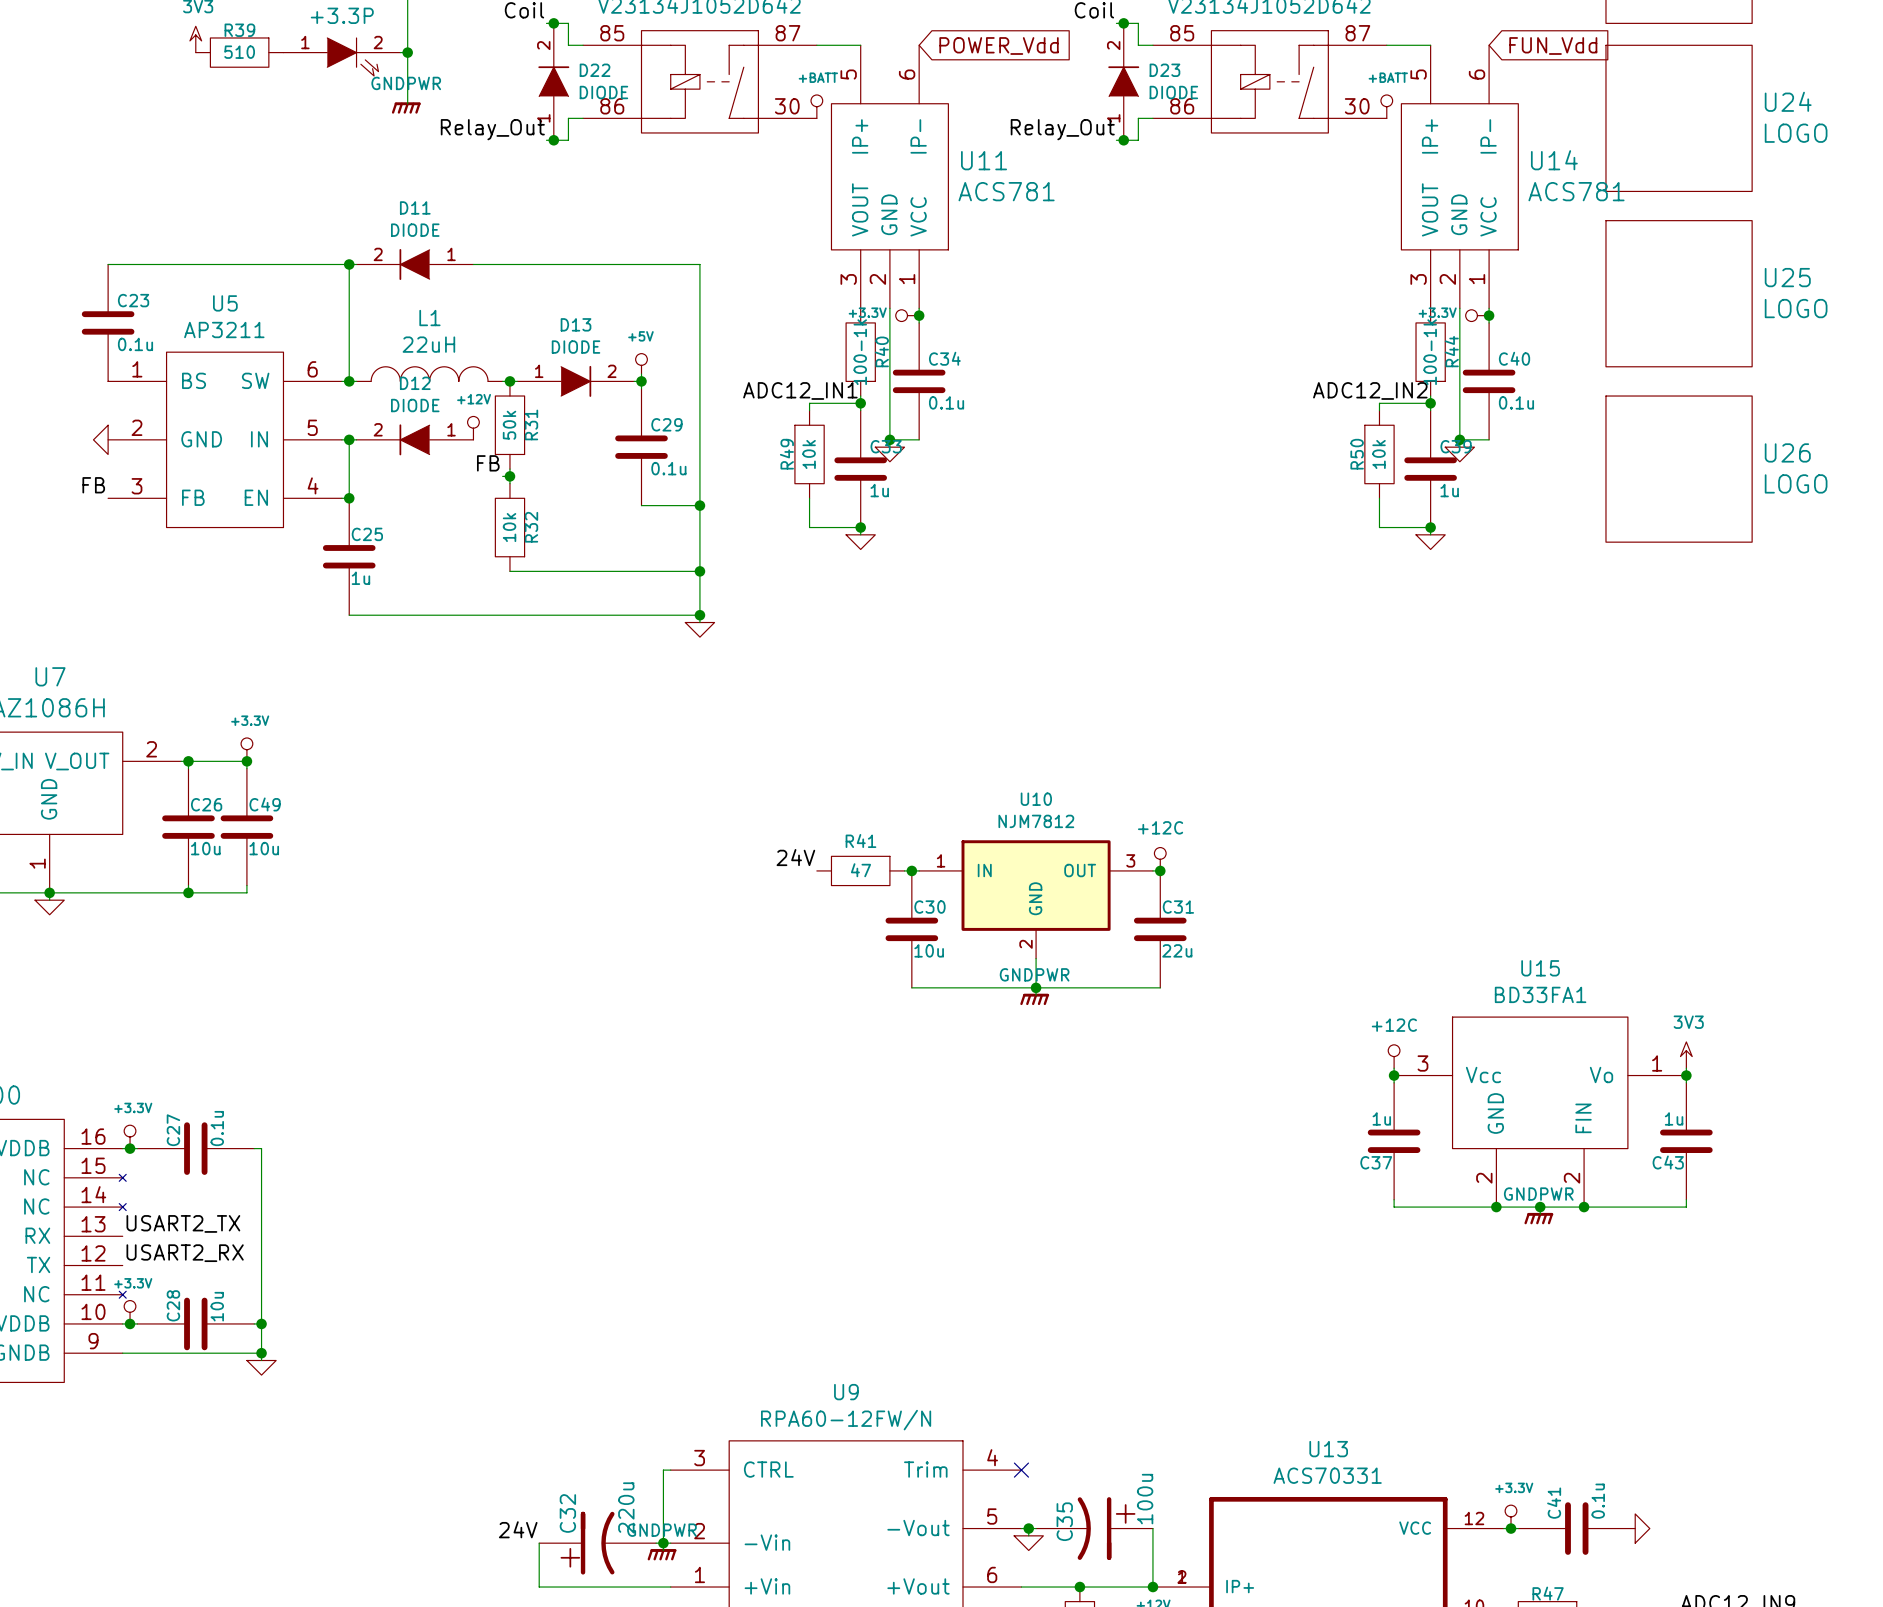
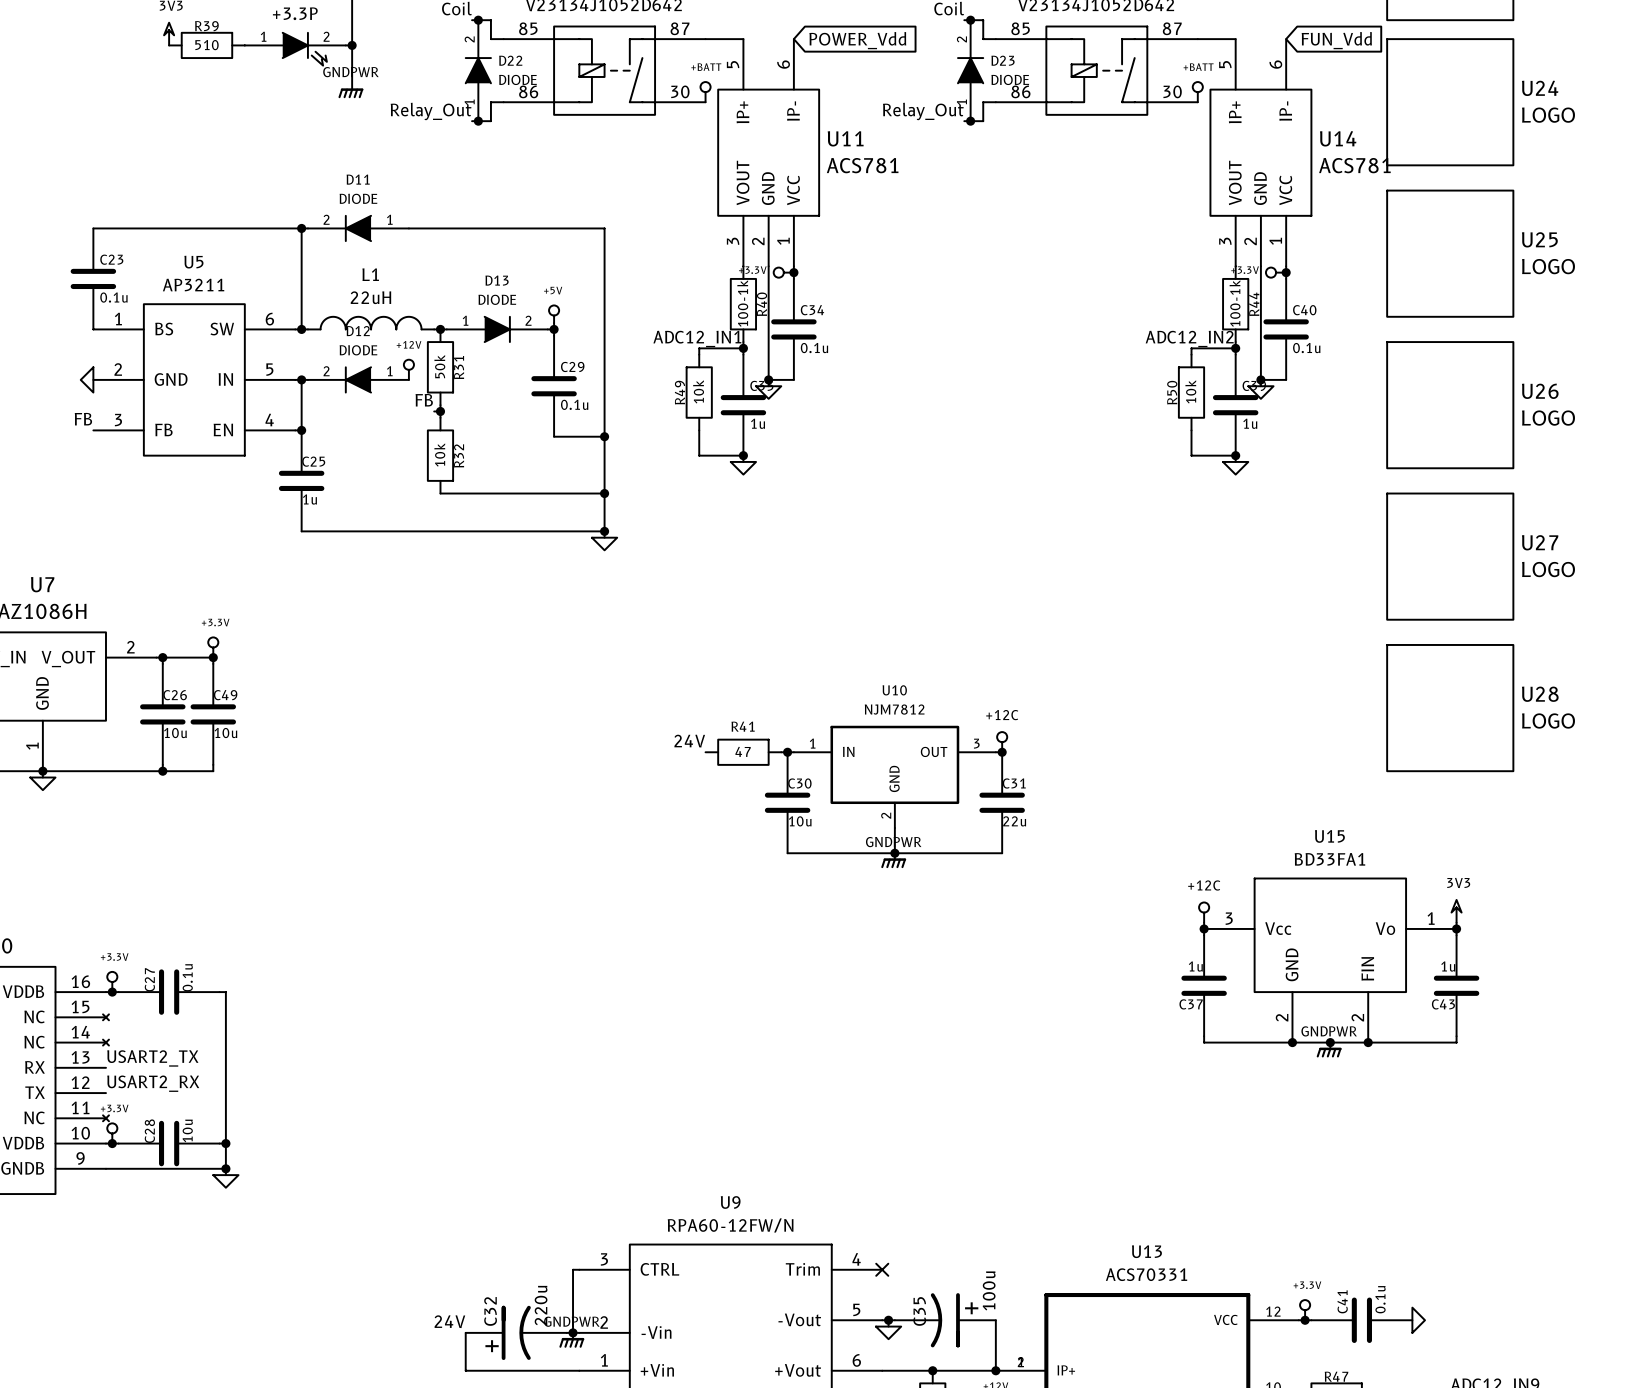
U27: none -> LOGO (1450, 556)
U28: none -> LOGO (1450, 708)

